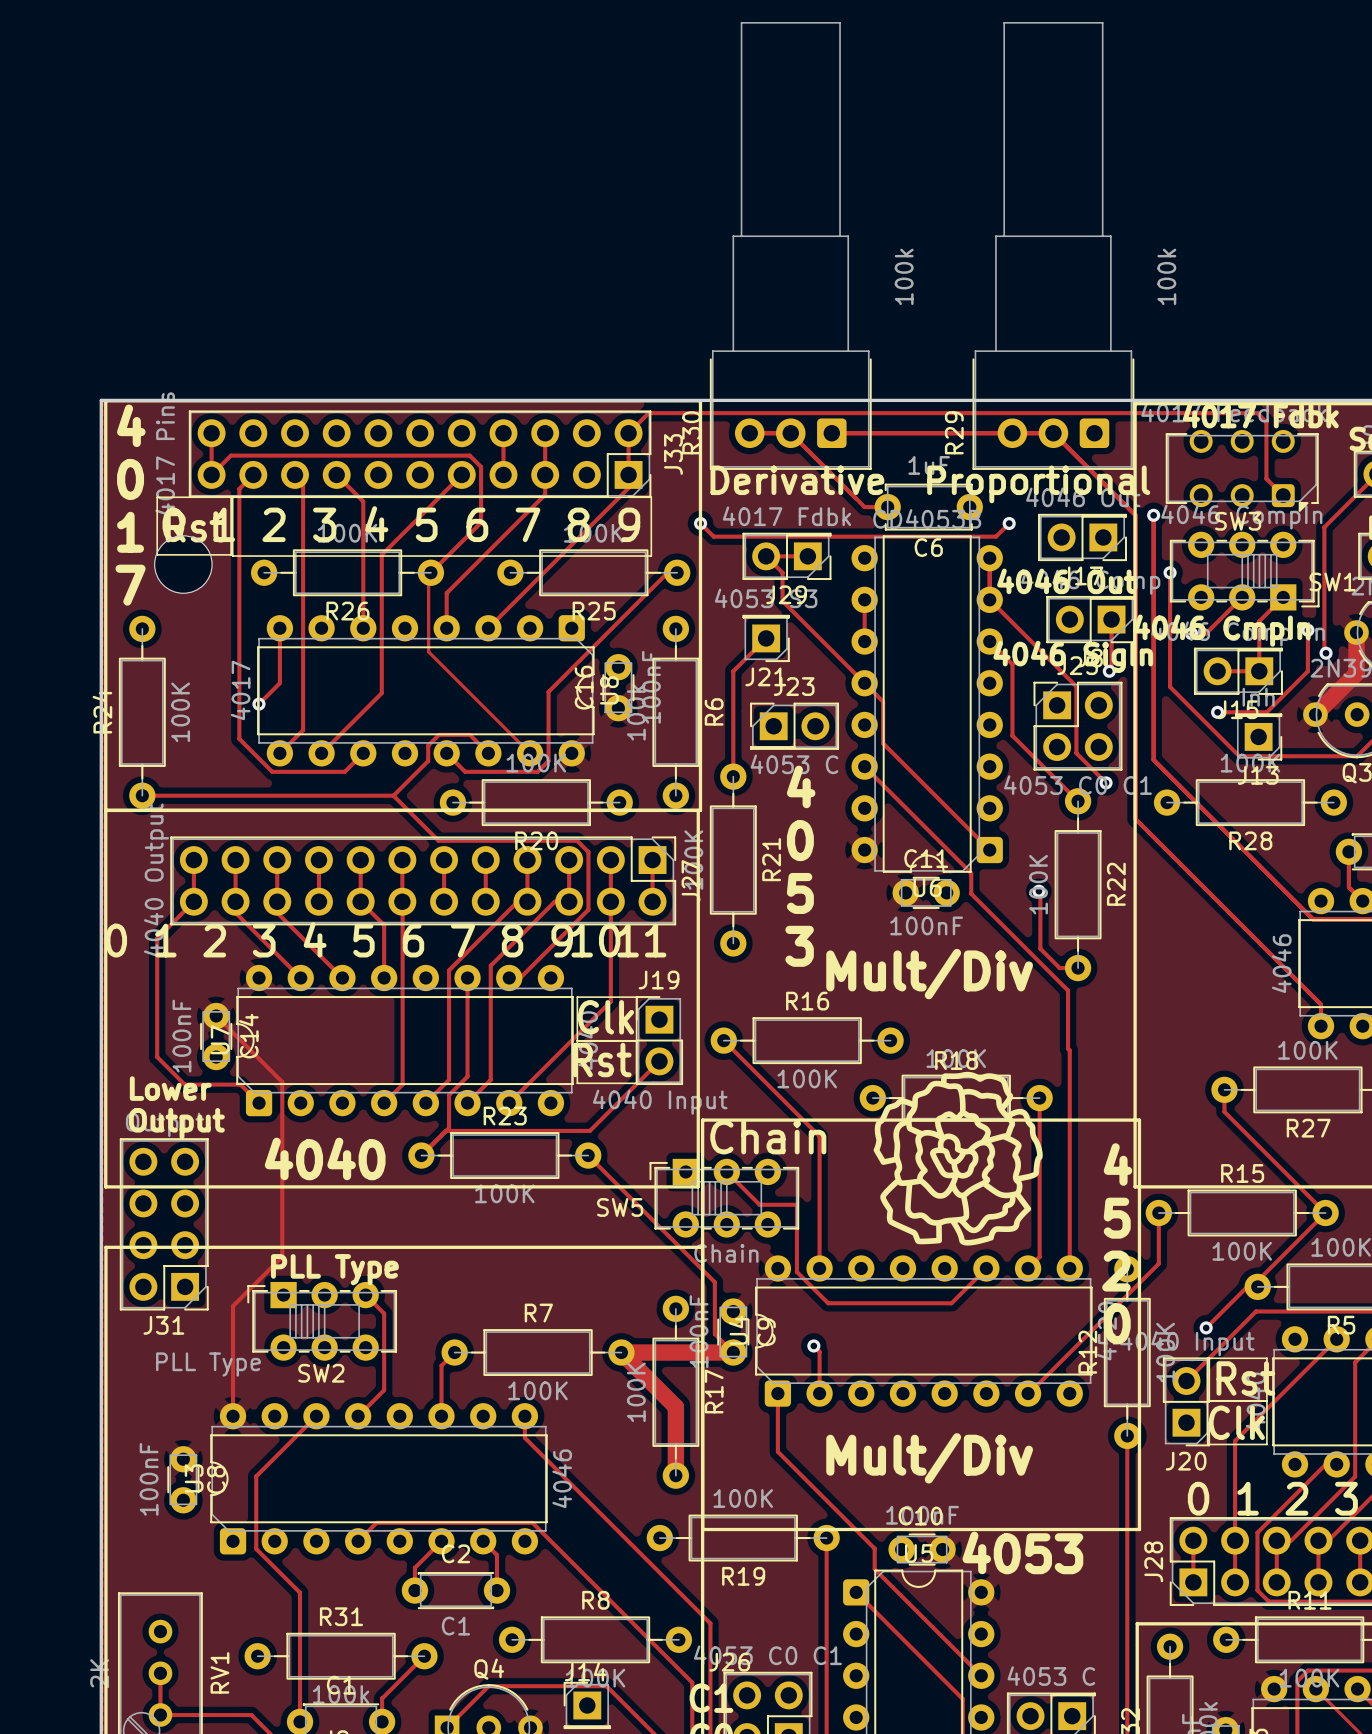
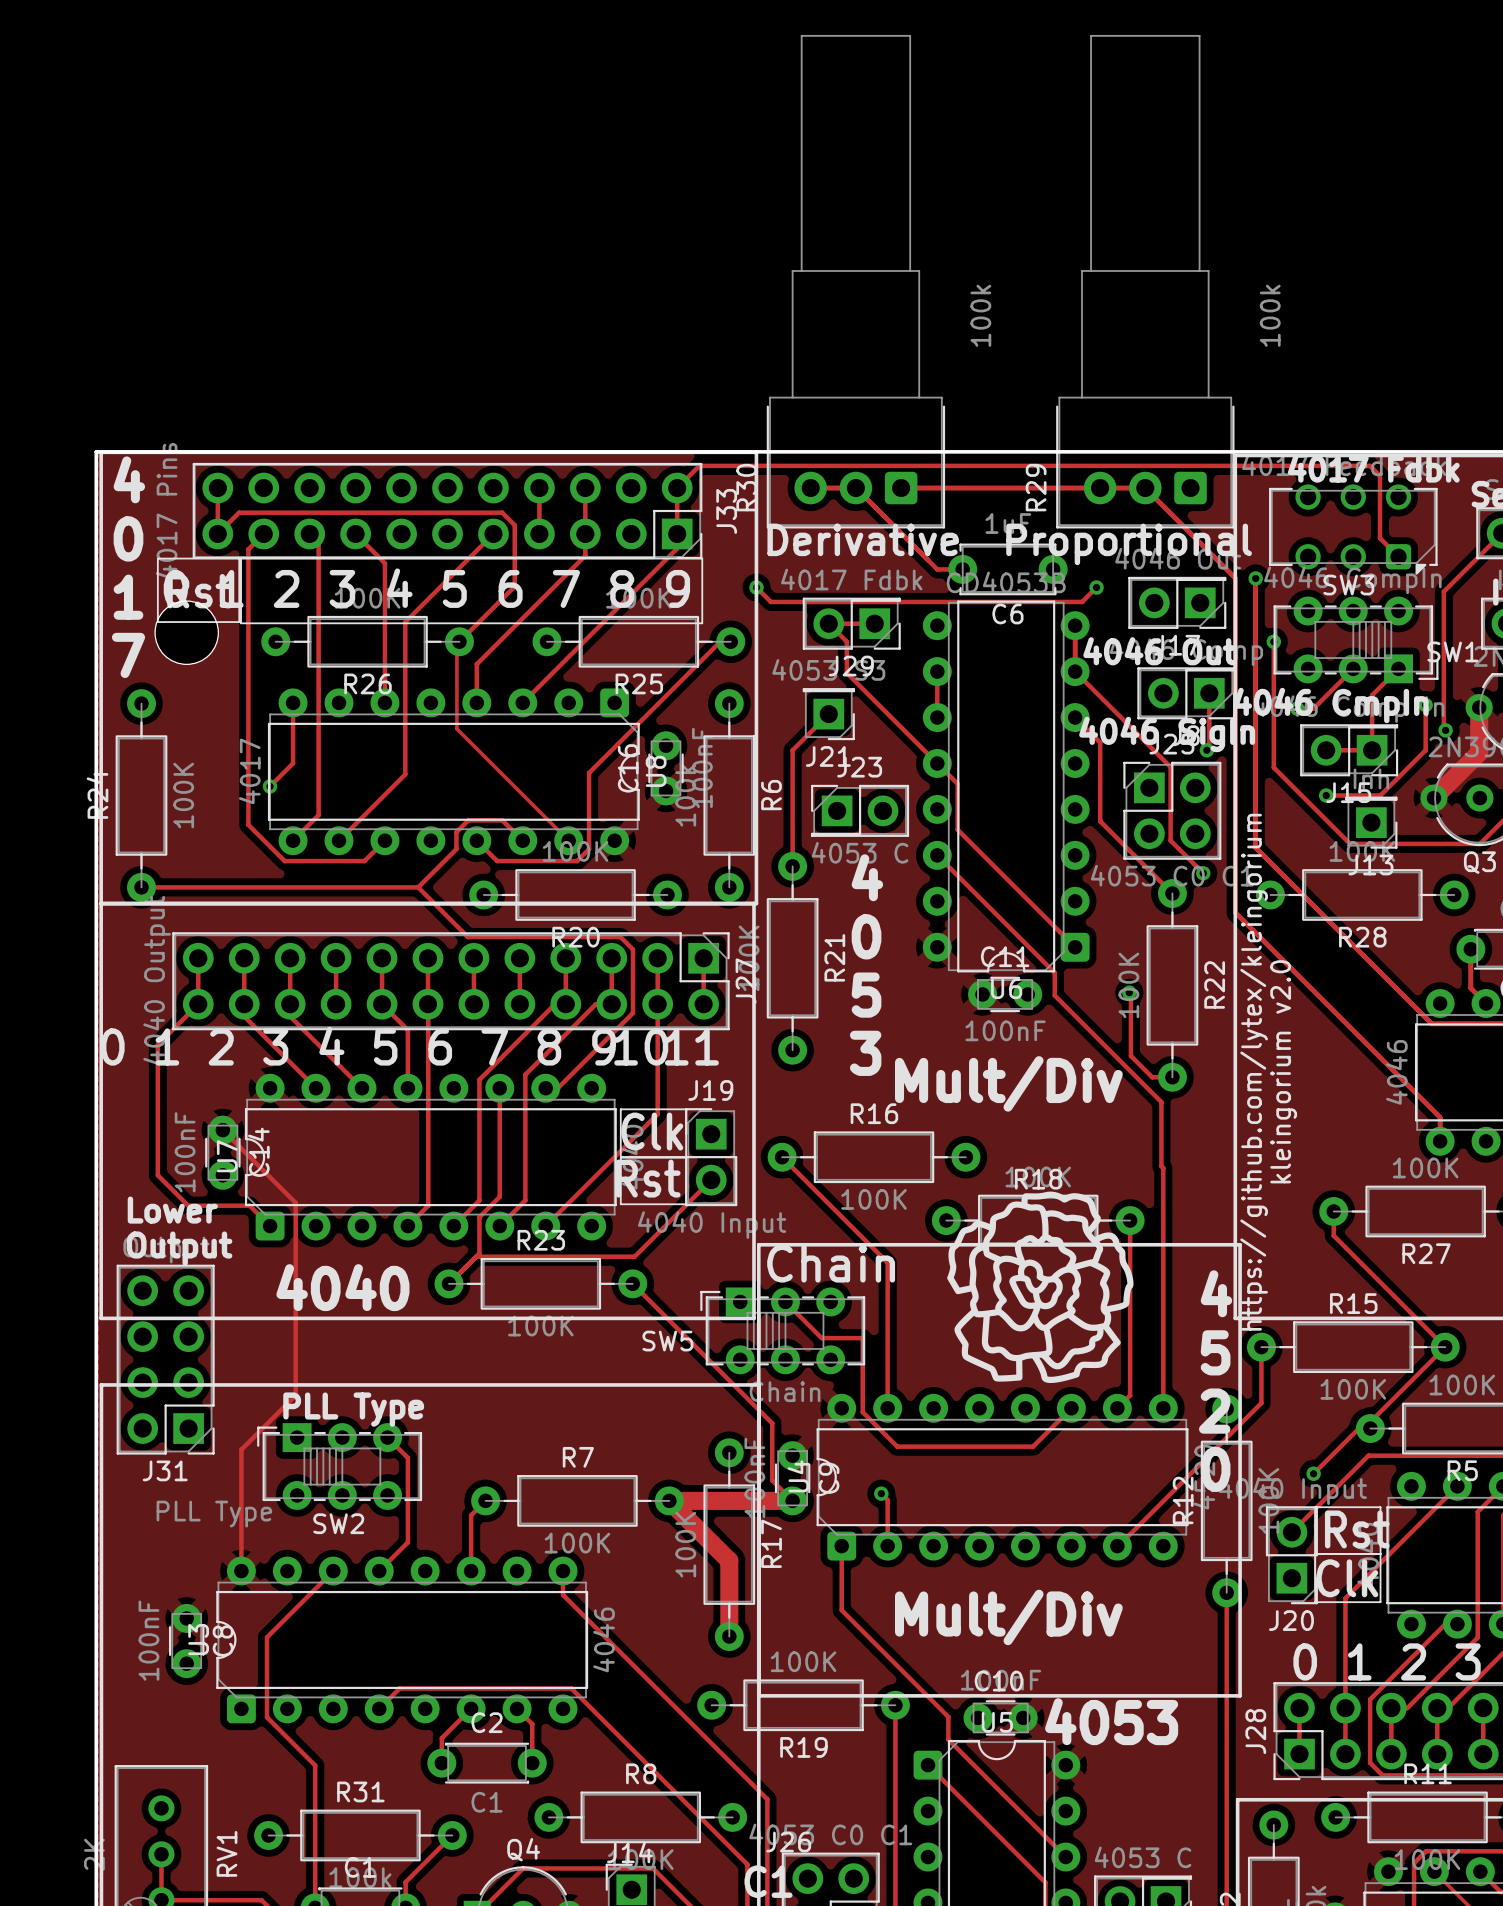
text: none -> https://github.com/lytex/kleingorium (1254, 1072)
text: none -> kleingorium v2.0 (1283, 1071)

